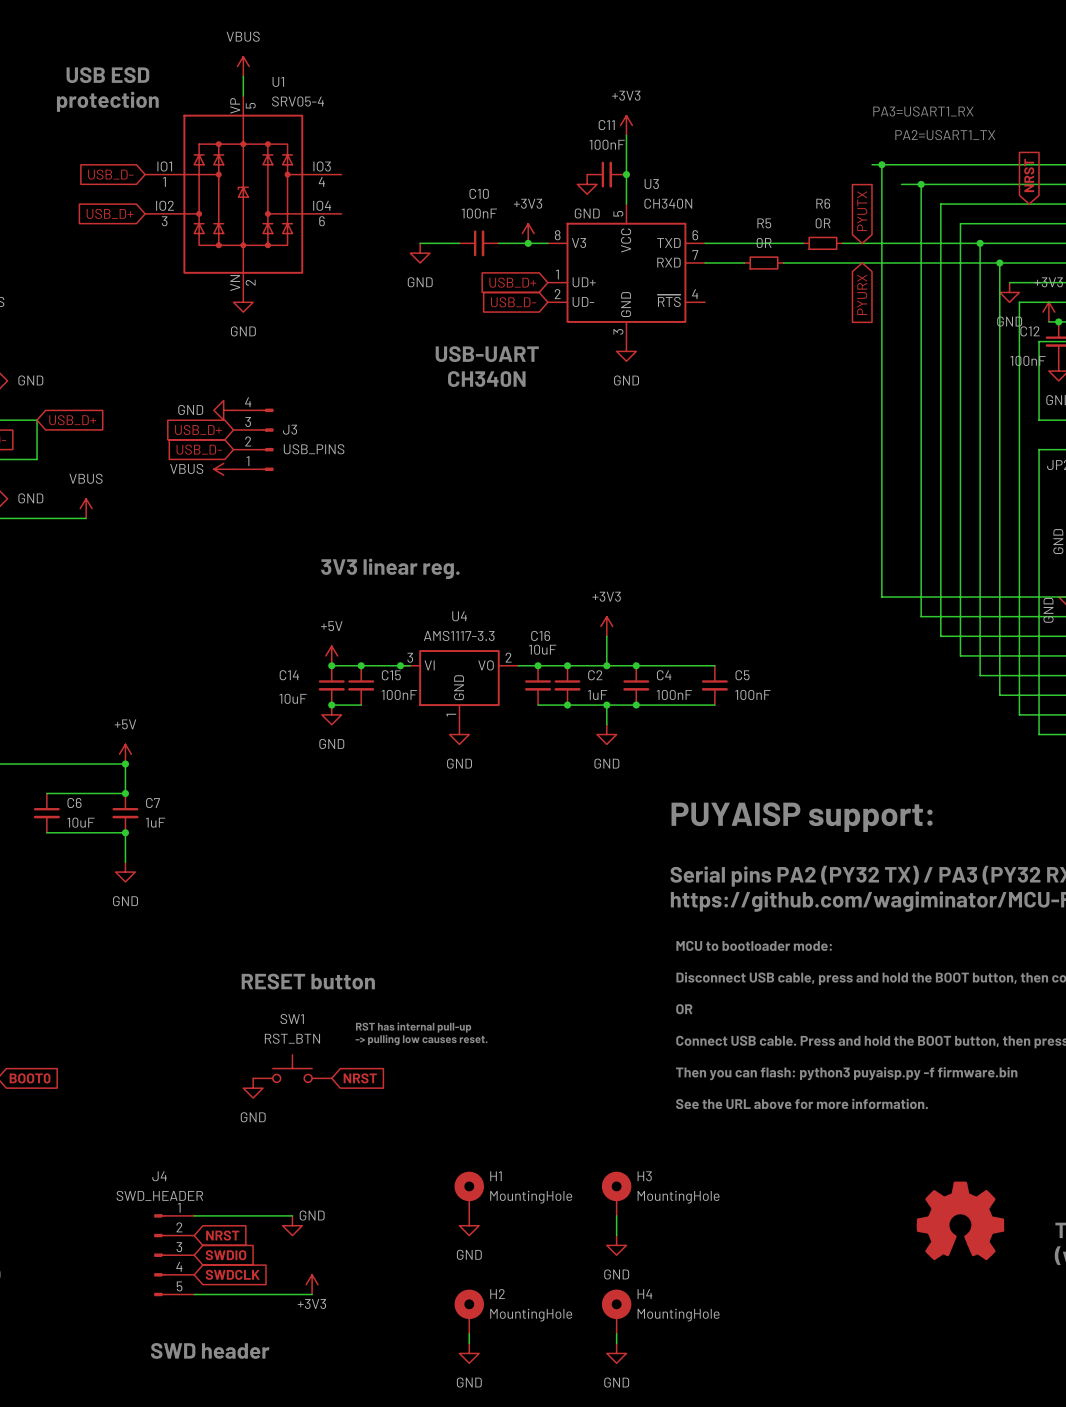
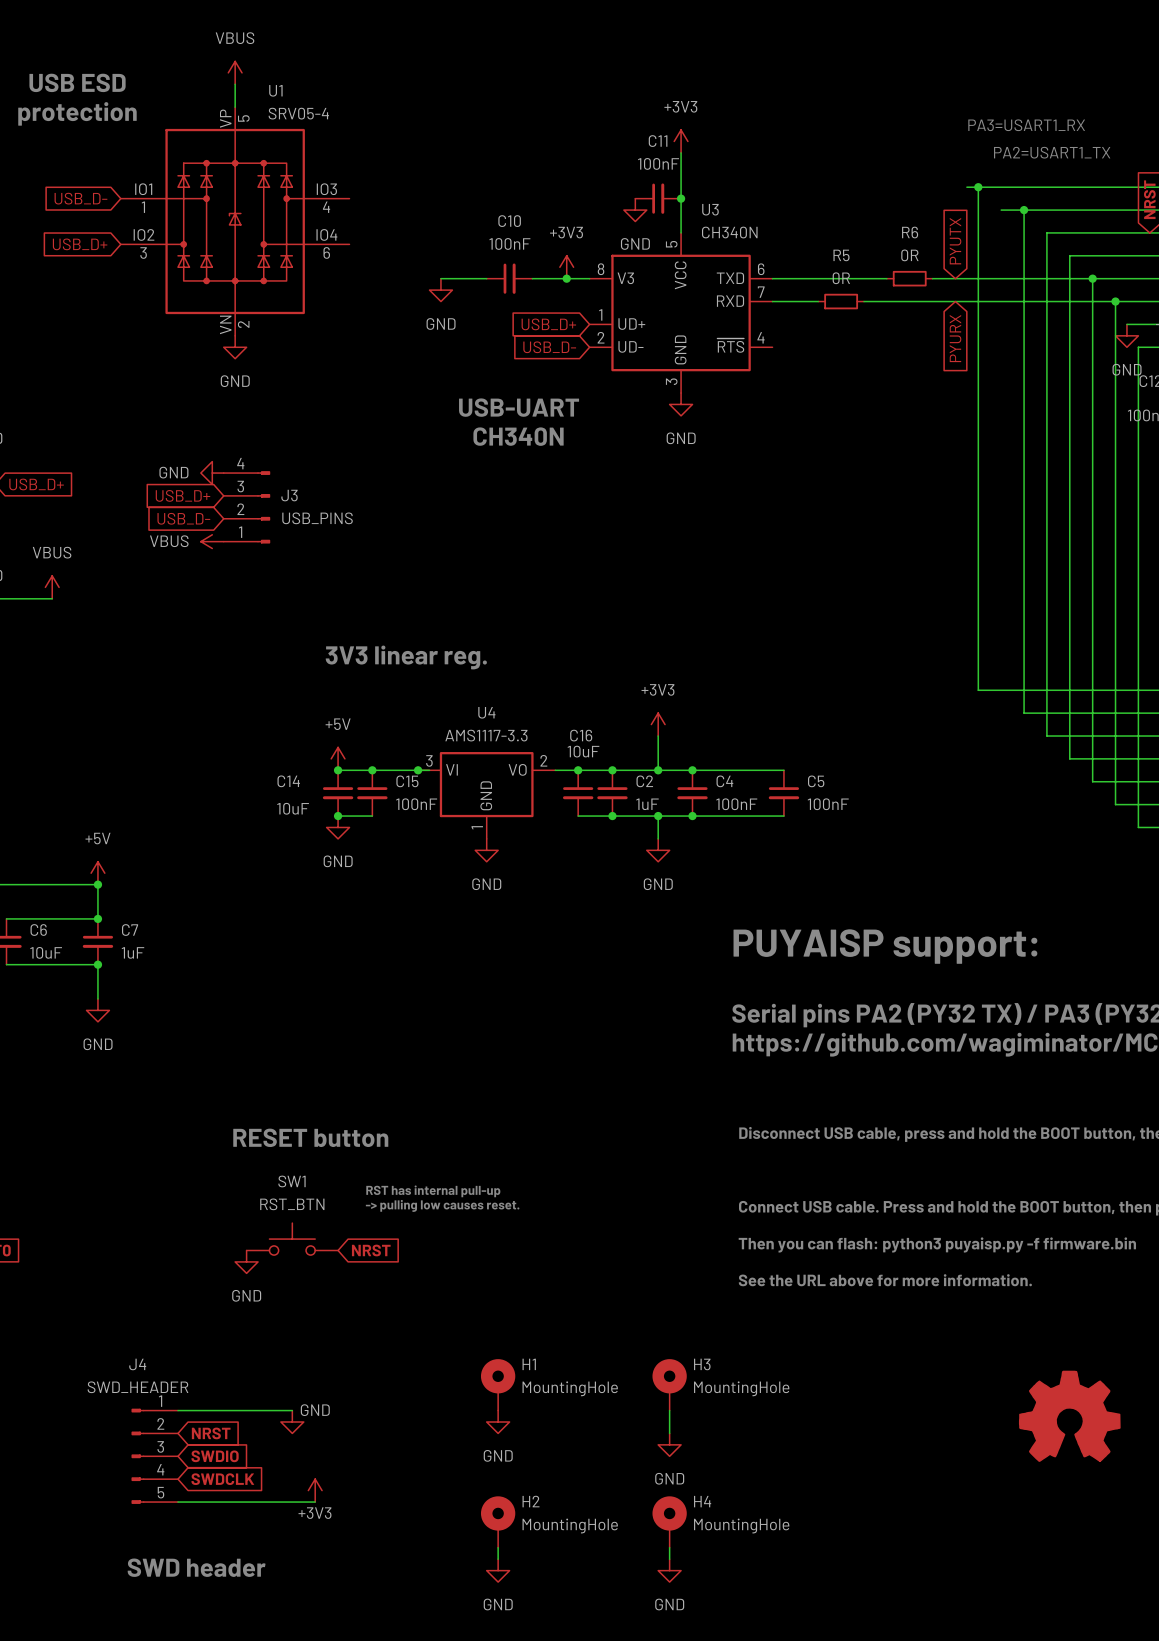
text: MCU to bootloader mode: (754, 945) -> none
text: OR (684, 1009) -> none

